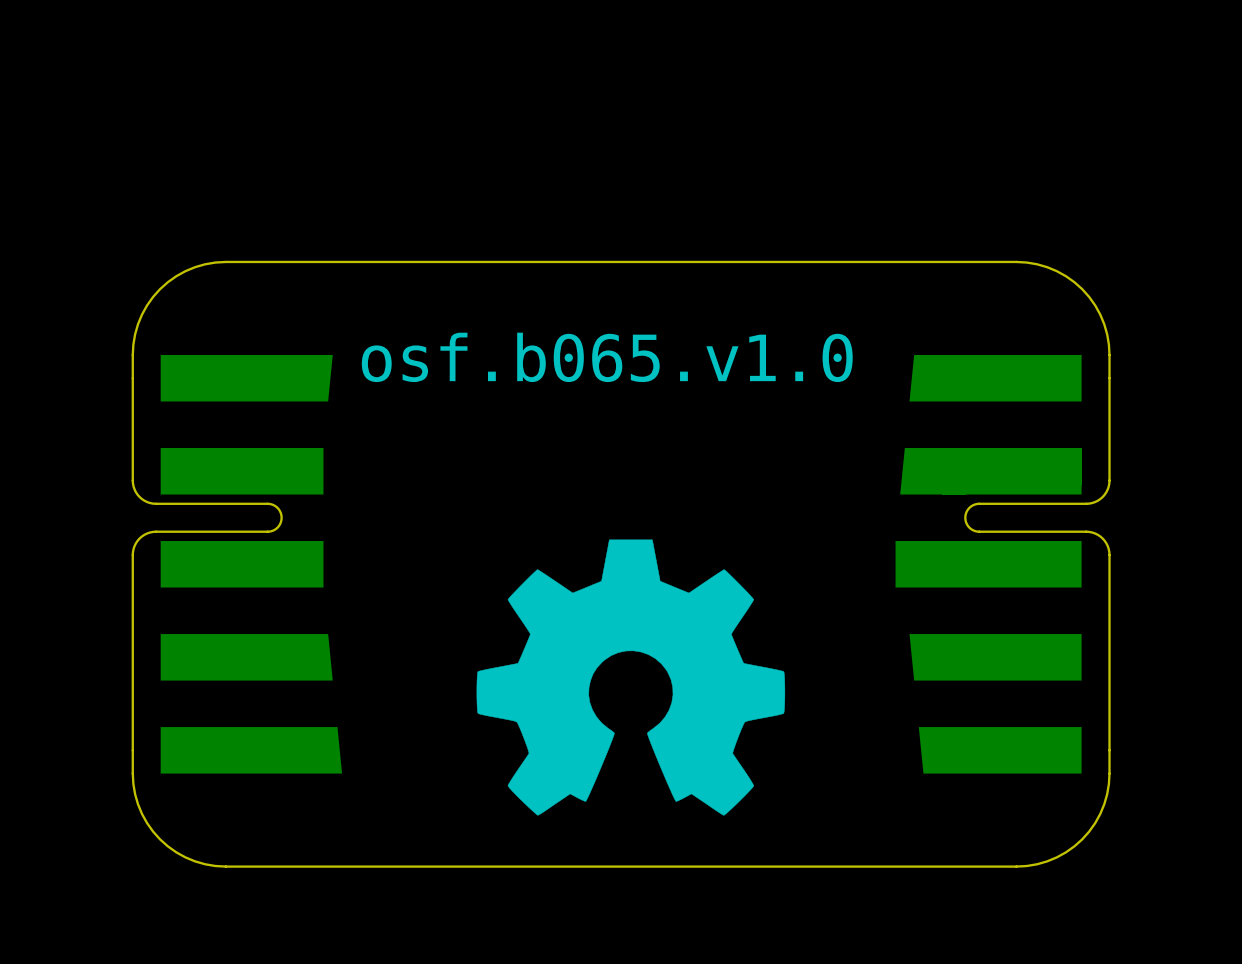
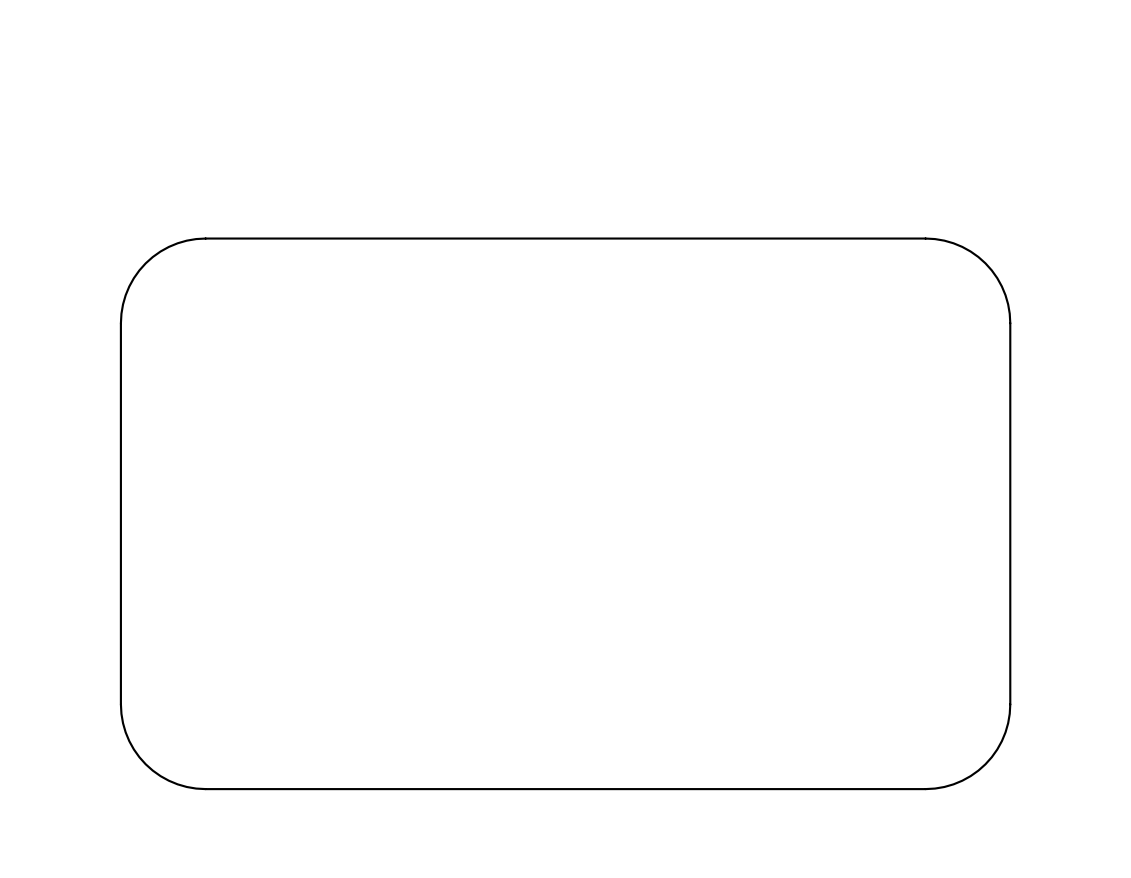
text: osf.b065.v1.0 (607, 357) -> none
board edge: none -> (120, 344) (120, 683)
board edge: none -> (1010, 344) (1010, 683)
drawing: [476, 539, 786, 816] -> none
part: (236, 564) -> none
part: (1003, 564) -> none

